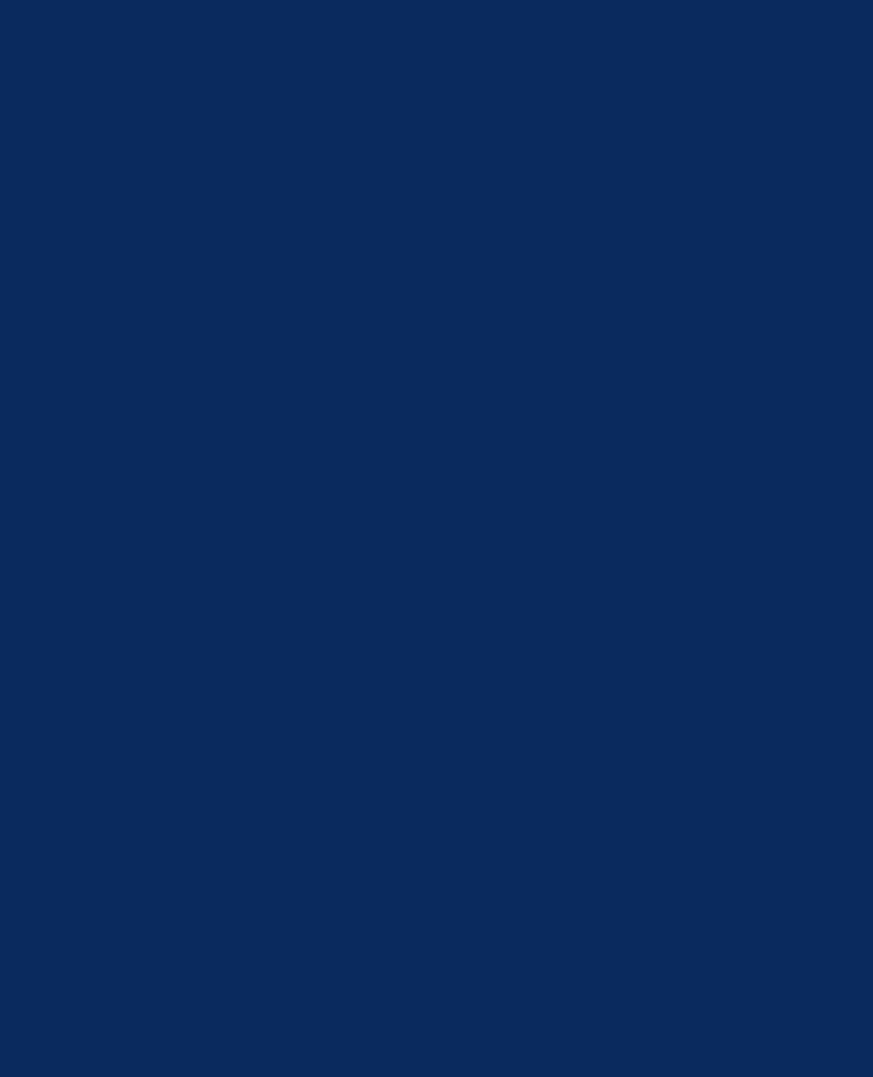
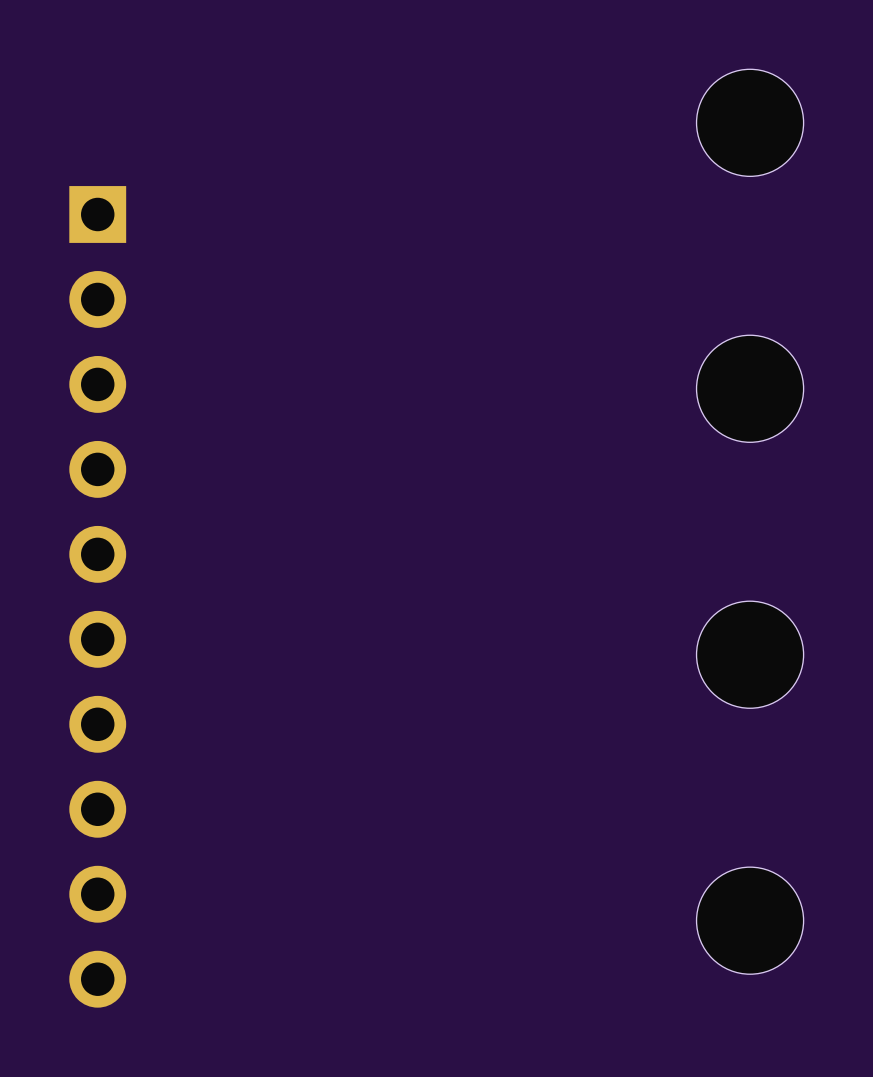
part: none -> (750, 122)
part: none -> (750, 388)
part: none -> (97, 596)
part: none -> (750, 654)
part: none -> (750, 920)

